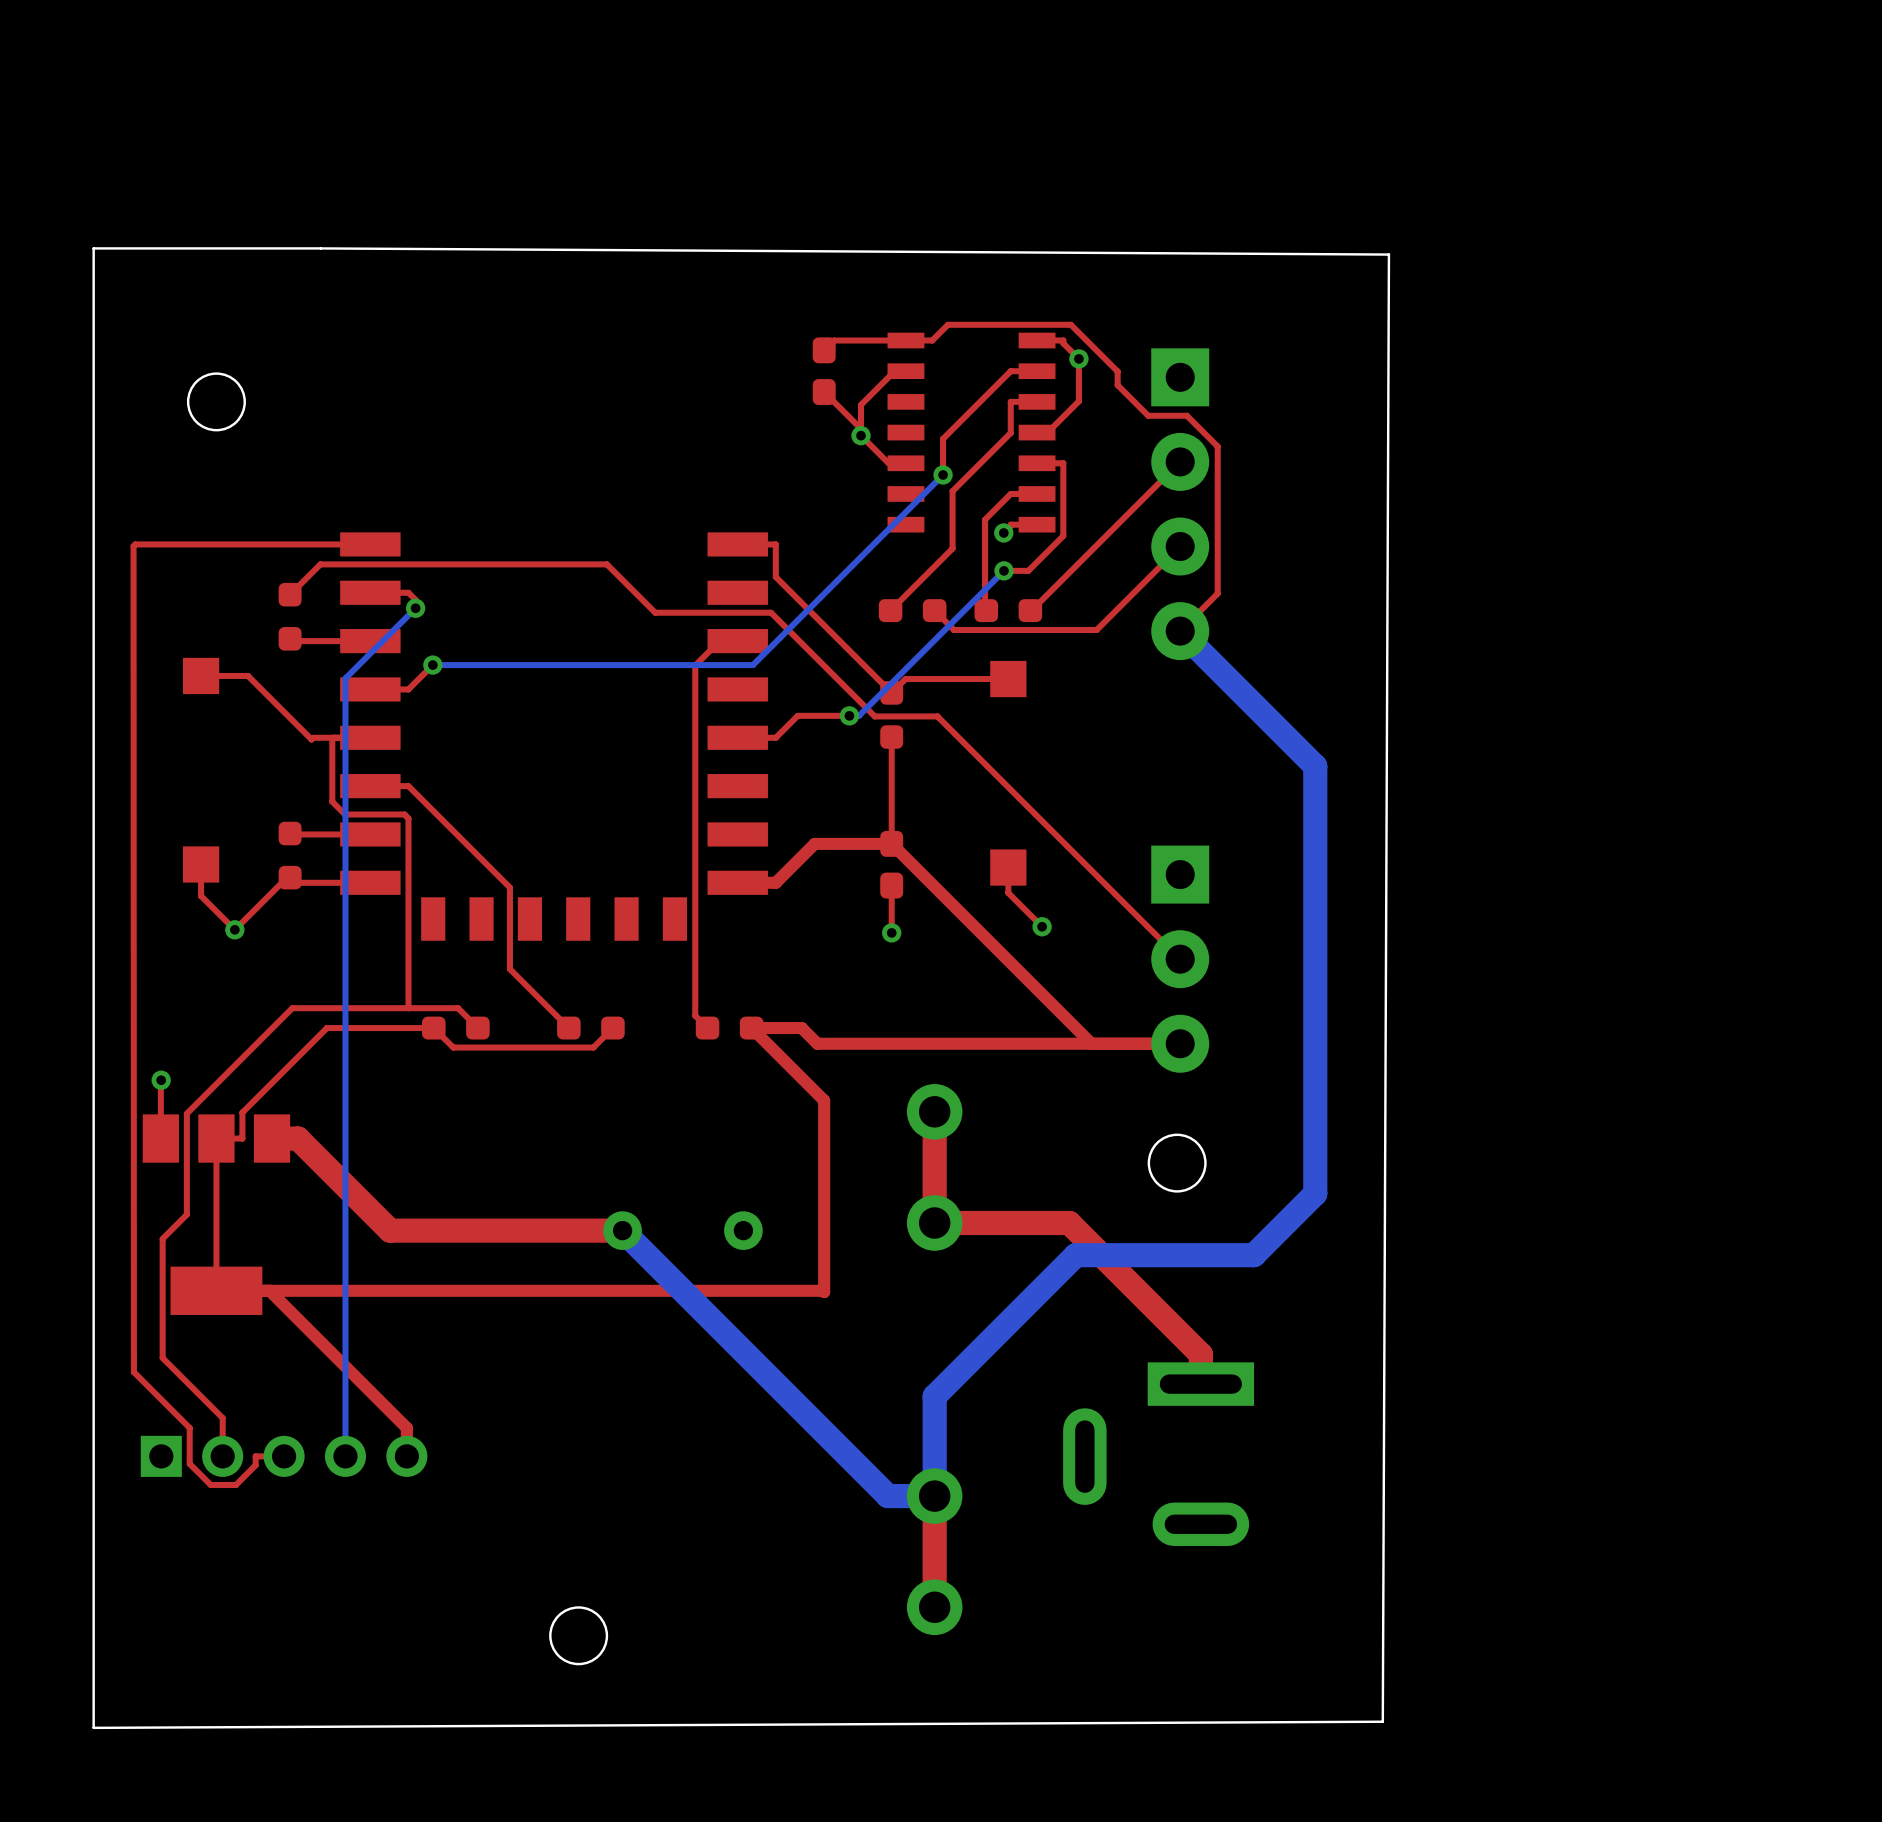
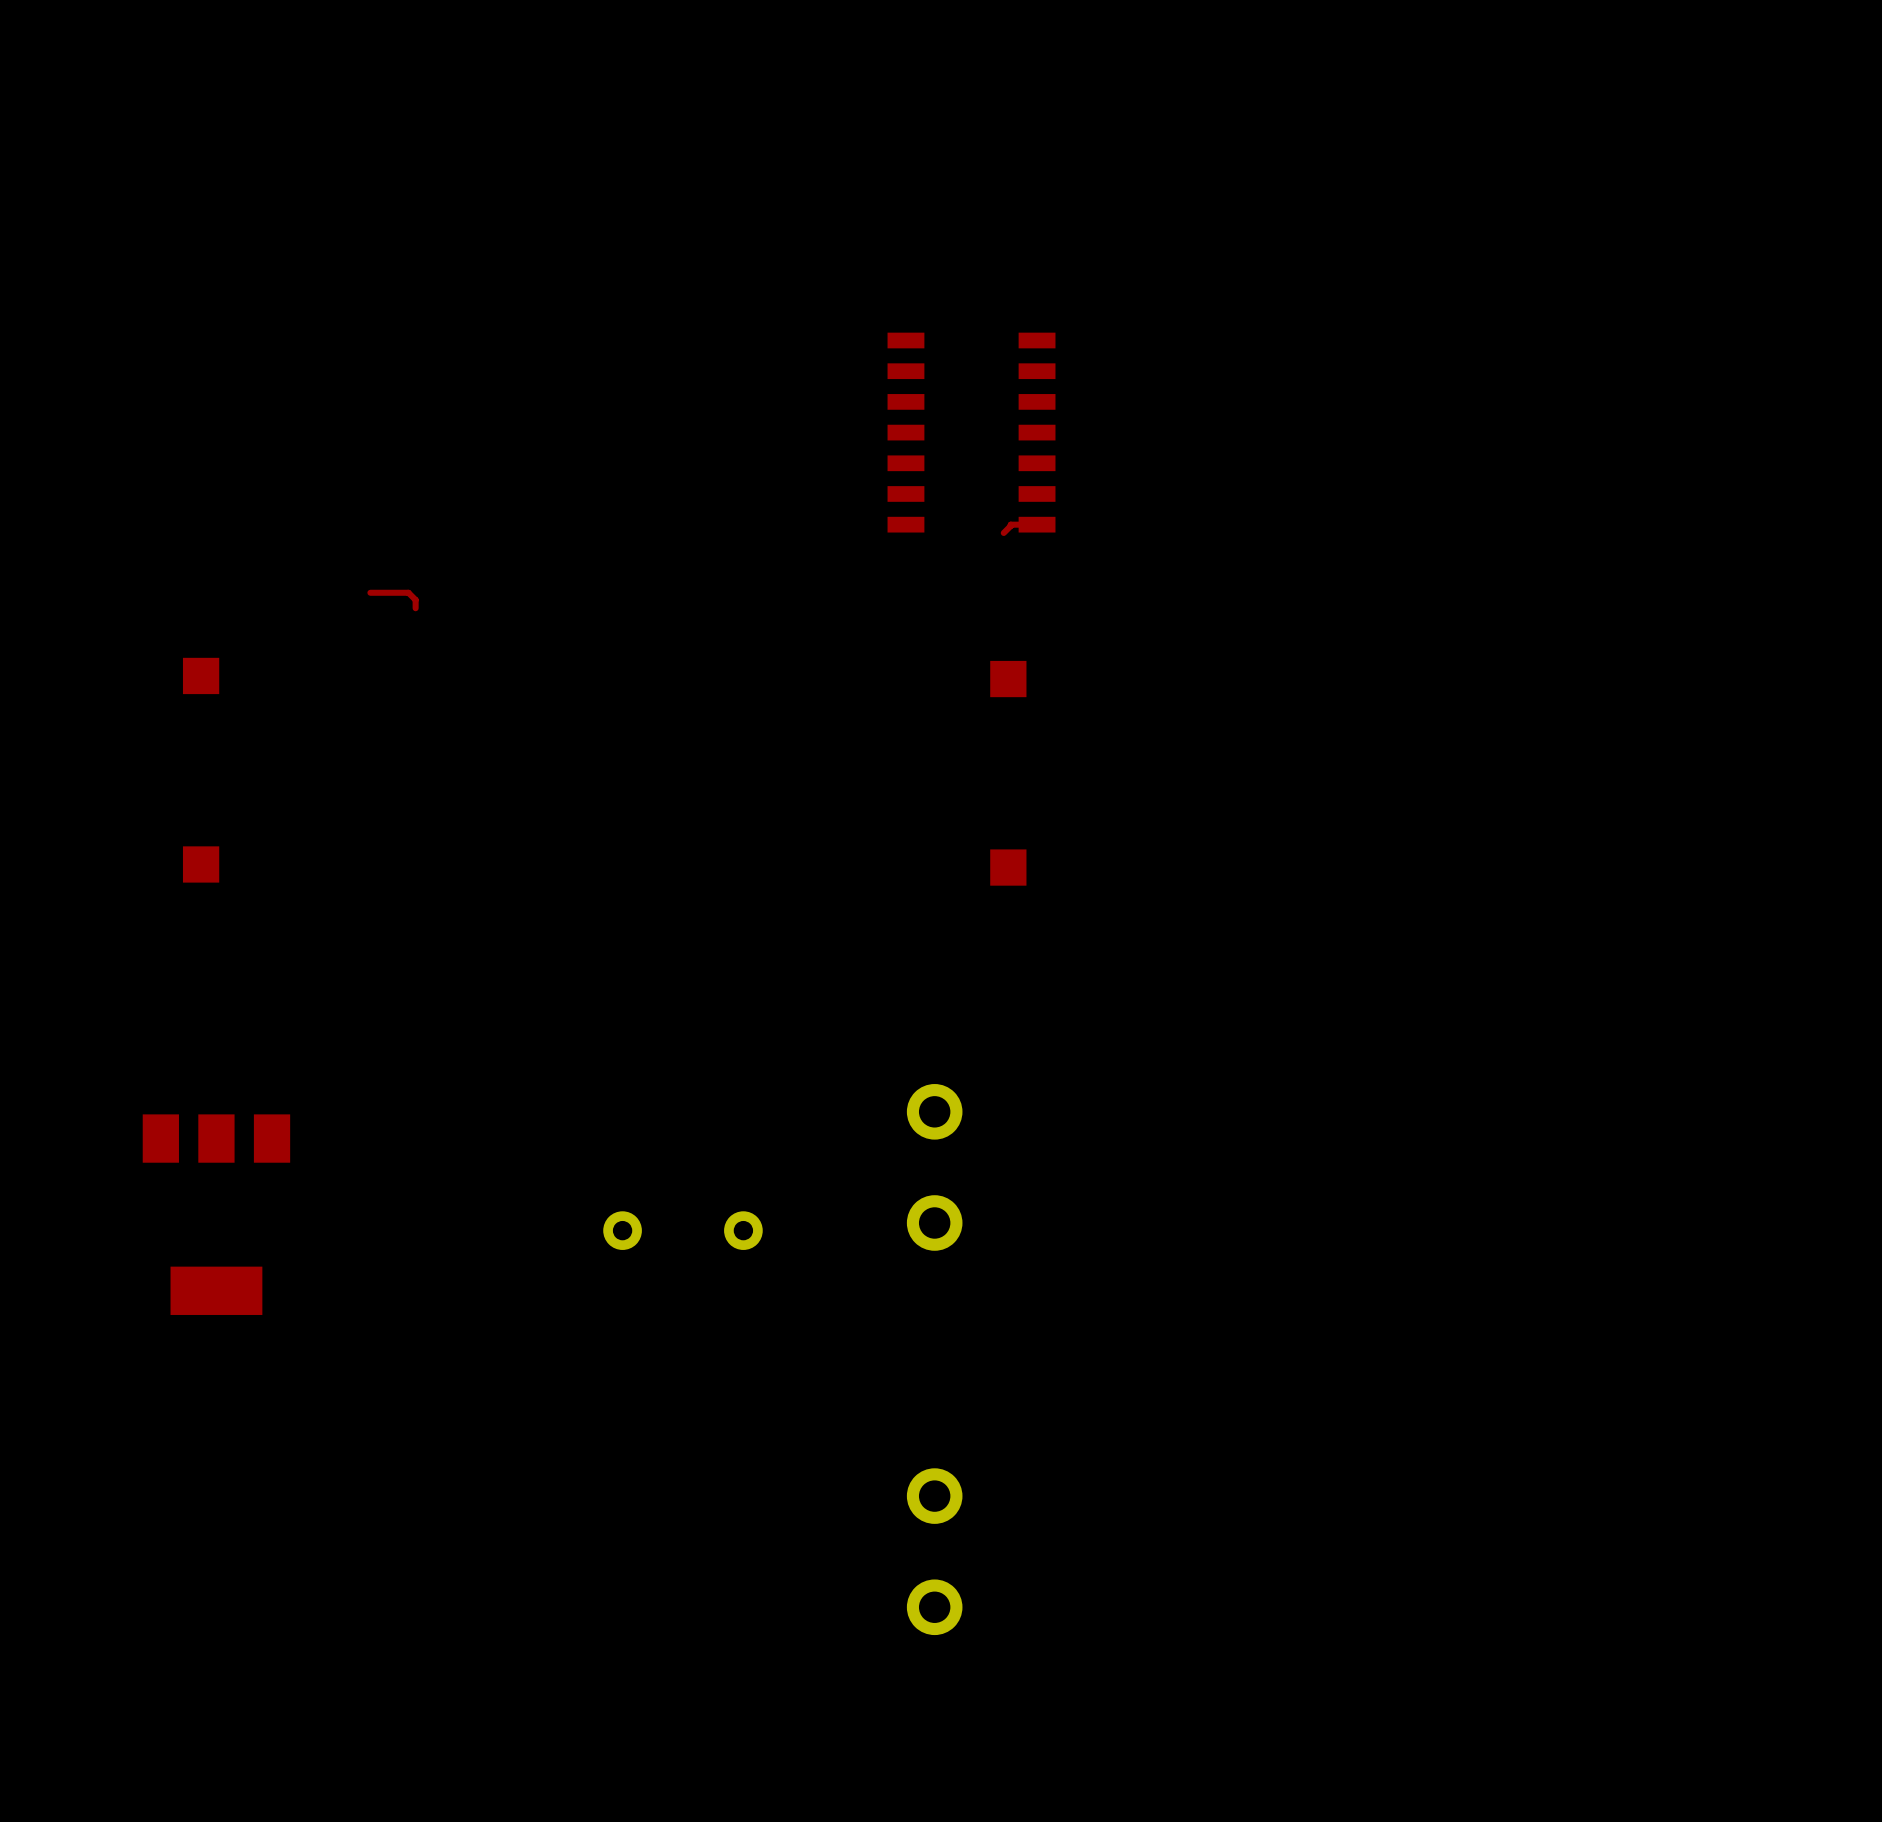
board edge: (320, 248) (1388, 254) (1382, 1721) (93, 1727) (93, 248) (320, 248) -> none
top track: (1037, 340) (1063, 340) (1063, 343) (1078, 358) (1078, 401) (1047, 432) (1037, 432) -> none
top track: (824, 350) (834, 340) (932, 340) (947, 324) (1070, 324) (1117, 371) (1117, 385) (1148, 415) (1186, 415) (1217, 446) (1217, 593) (1180, 631) -> none
via: (1078, 358) -> none
part: (824, 371) -> none
top track: (905, 371) (894, 371) (861, 404) (861, 435) (888, 463) (905, 463) -> none
top track: (1037, 371) (1010, 371) (943, 438) (943, 474) -> none
round board edge: [186, 372, 246, 432] -> none
top track: (824, 392) (861, 428) -> none
top track: (1037, 401) (1010, 401) (1010, 433) (952, 491) (952, 548) (890, 610) -> none
via: (861, 435) -> none
top track: (1180, 461) (1030, 610) -> none
top track: (1037, 463) (1063, 463) (1063, 535) (1028, 570) (1003, 570) -> none
bottom track: (943, 474) (752, 665) (432, 665) -> none
via: (943, 474) -> none
top track: (1037, 493) (1010, 493) (985, 519) (986, 610) -> none
part: (1180, 504) -> none
via: (1003, 532) -> none
top track: (370, 544) (135, 544) (133, 546) (133, 1372) (189, 1427) (189, 1463) (210, 1485) (235, 1485) (255, 1465) (255, 1456) (284, 1456) -> none
top track: (737, 544) (775, 544) (775, 577) (891, 692) (905, 679) (1008, 679) -> none
top track: (1180, 546) (1096, 629) (954, 629) (934, 610) -> none
bottom track: (1003, 570) (859, 715) (849, 715) -> none
via: (1003, 570) -> none
top track: (290, 594) (320, 564) (606, 564) (655, 612) (771, 612) (874, 716) (937, 716) (1180, 959) -> none
bottom track: (415, 608) (345, 678) (345, 1456) -> none
via: (415, 608) -> none
part: (912, 610) -> none
part: (1008, 610) -> none
part: (290, 616) -> none
bottom track: (1180, 631) (1315, 766) (1315, 1193) (1253, 1255) (1075, 1255) (934, 1396) (934, 1496) (888, 1496) (622, 1230) -> none
top track: (290, 638) (292, 641) (370, 641) -> none
top track: (737, 641) (719, 641) (695, 665) (695, 1015) (707, 1028) -> none
top track: (432, 665) (408, 689) (370, 689) -> none
via: (432, 665) -> none
top track: (201, 675) (248, 675) (311, 739) (313, 737) (370, 737) -> none
part: (891, 714) -> none
top track: (849, 715) (797, 715) (775, 737) (737, 737) -> none
via: (849, 715) -> none
part: (554, 736) -> none
top track: (332, 737) (332, 801) (345, 814) (404, 814) (408, 818) (408, 1008) -> none
top track: (891, 737) (891, 843) -> none
top track: (370, 786) (408, 786) (509, 887) (509, 969) (568, 1028) -> none
top track: (290, 833) (370, 834) -> none
top track: (891, 843) (814, 843) (775, 882) (737, 882) -> none
top track: (891, 843) (1091, 1043) -> none
part: (290, 855) -> none
top track: (201, 864) (201, 896) (234, 929) (287, 877) (290, 877) (295, 882) (370, 882) -> none
part: (891, 864) -> none
top track: (1008, 882) (1008, 892) (1042, 926) -> none
top track: (891, 885) (891, 932) -> none
via: (1042, 926) -> none
via: (234, 929) -> none
via: (891, 932) -> none
part: (1180, 959) -> none
part: (455, 1028) -> none
top track: (477, 1028) (458, 1008) (292, 1008) (186, 1113) (186, 1214) (162, 1238) (162, 1358) (222, 1418) (222, 1456) -> none
part: (590, 1028) -> none
top track: (612, 1028) (593, 1047) (453, 1047) (433, 1028) (326, 1028) (242, 1112) (242, 1138) (216, 1138) (216, 1273) (233, 1290) (216, 1290) (824, 1292) (824, 1100) (751, 1028) (801, 1028) (817, 1043) (1180, 1043) -> none
part: (729, 1028) -> none
top track: (160, 1080) (160, 1138) -> none
via: (161, 1080) -> none
top track: (934, 1111) (934, 1222) (1069, 1222) (1200, 1354) (1200, 1384) -> none
round board edge: [1147, 1133, 1207, 1193] -> none
top track: (272, 1138) (298, 1138) (390, 1230) (622, 1230) -> none
top track: (270, 1290) (406, 1427) (406, 1456) -> none
part: (1158, 1454) -> none
part: (284, 1456) -> none
top track: (934, 1496) (934, 1607) -> none
round board edge: [549, 1606, 609, 1666] -> none

